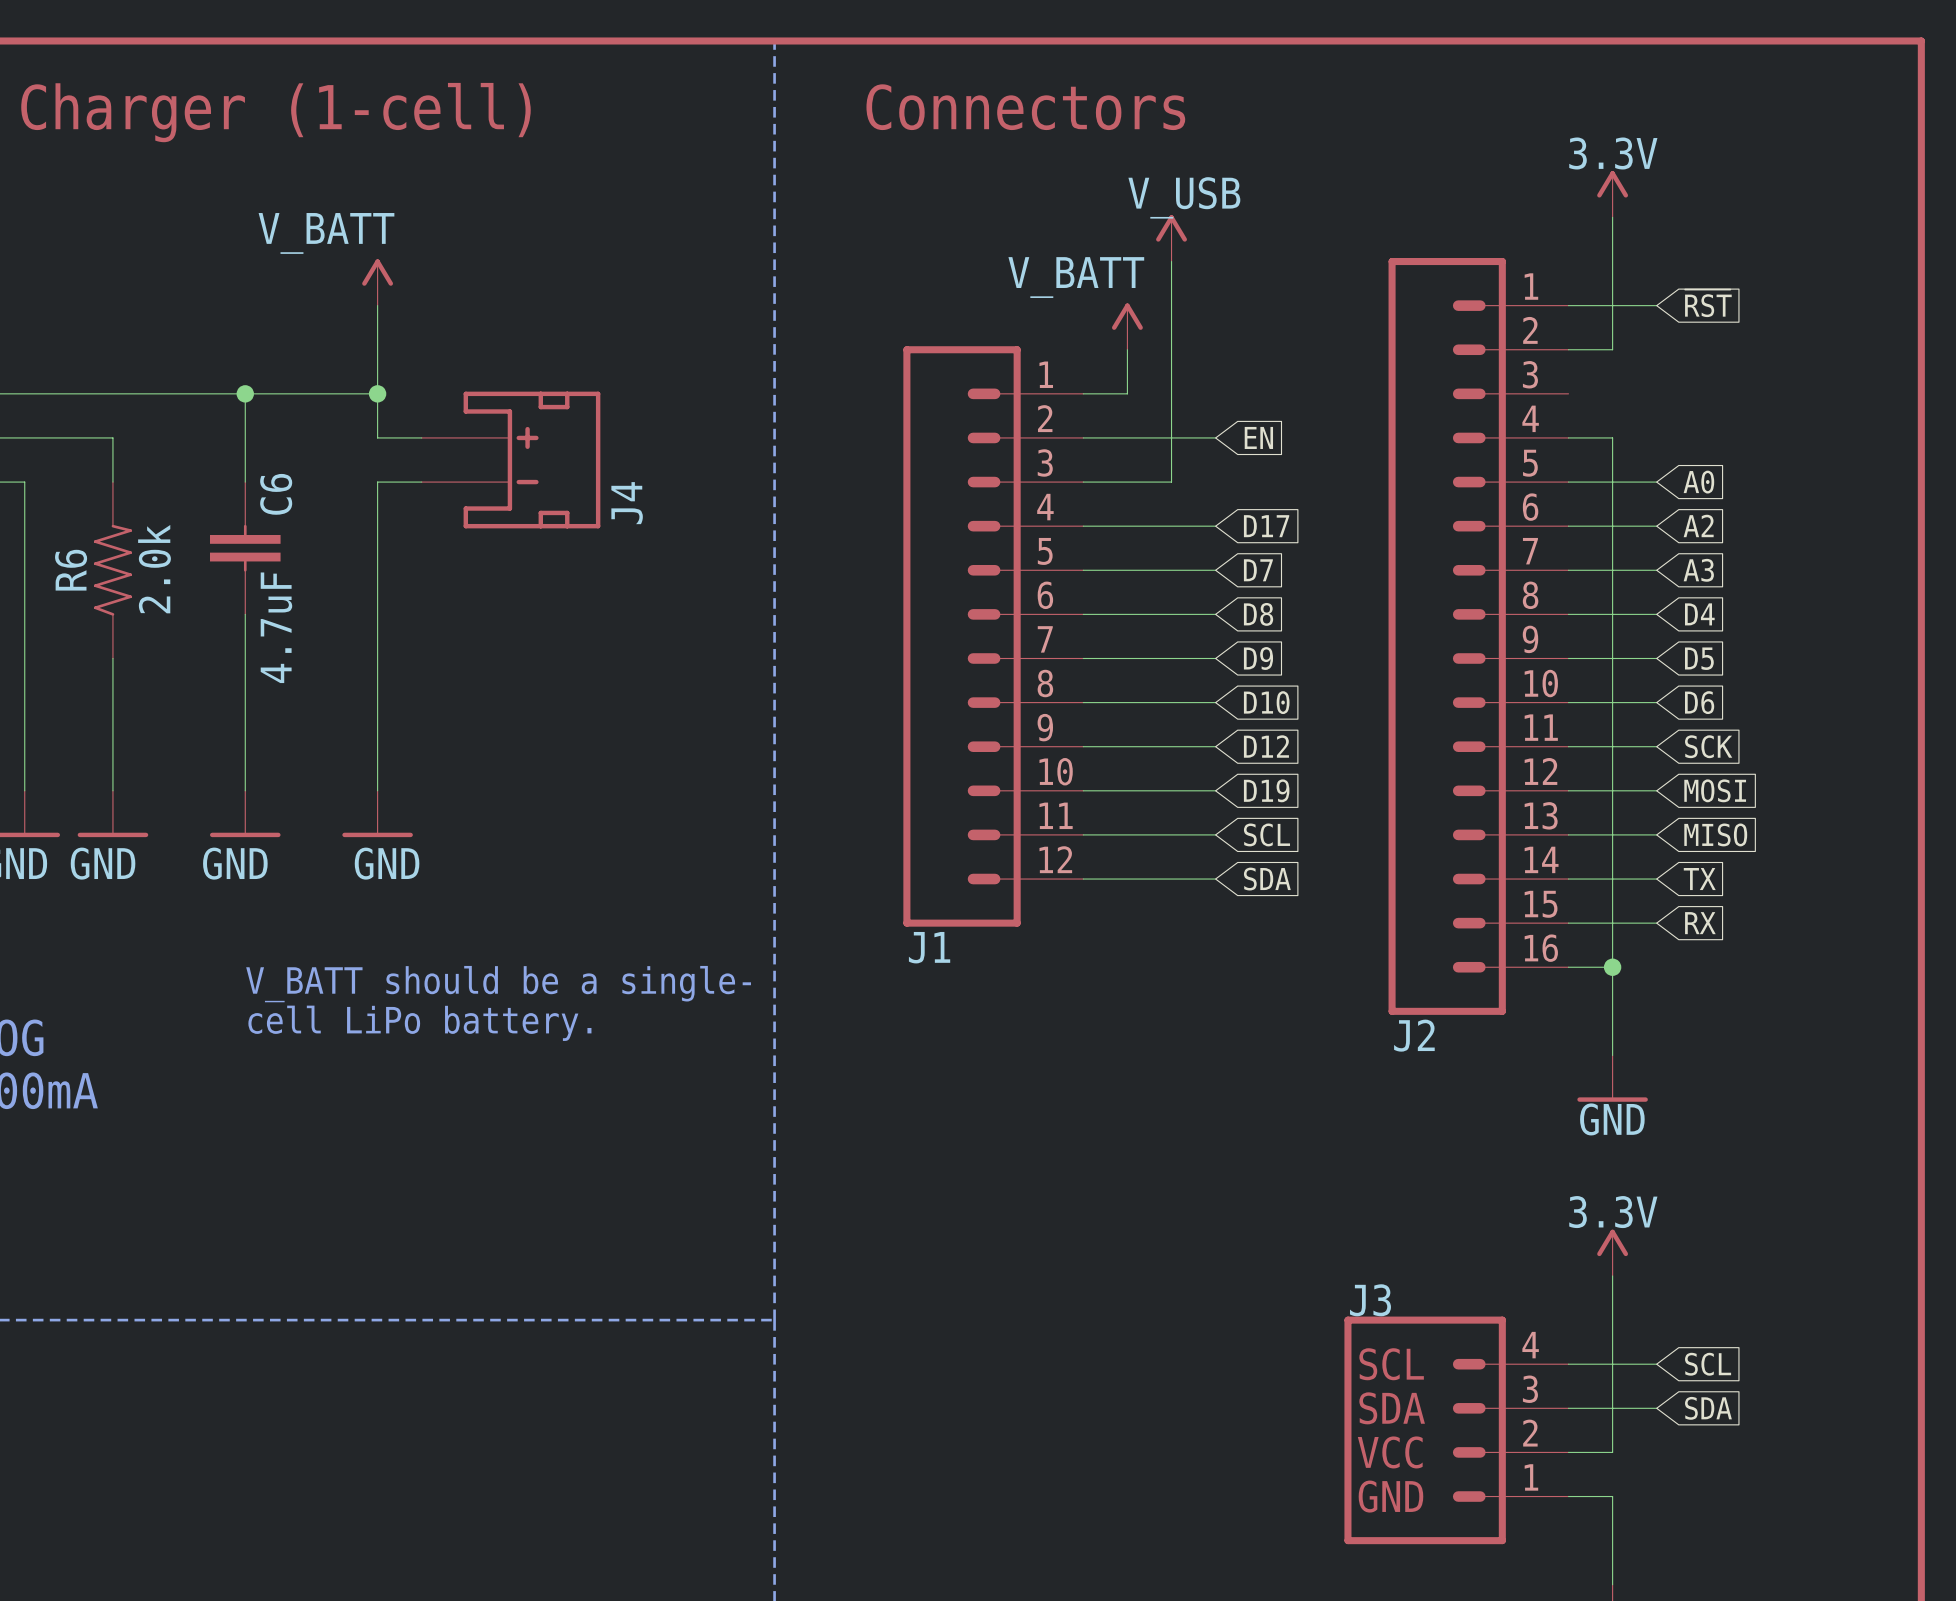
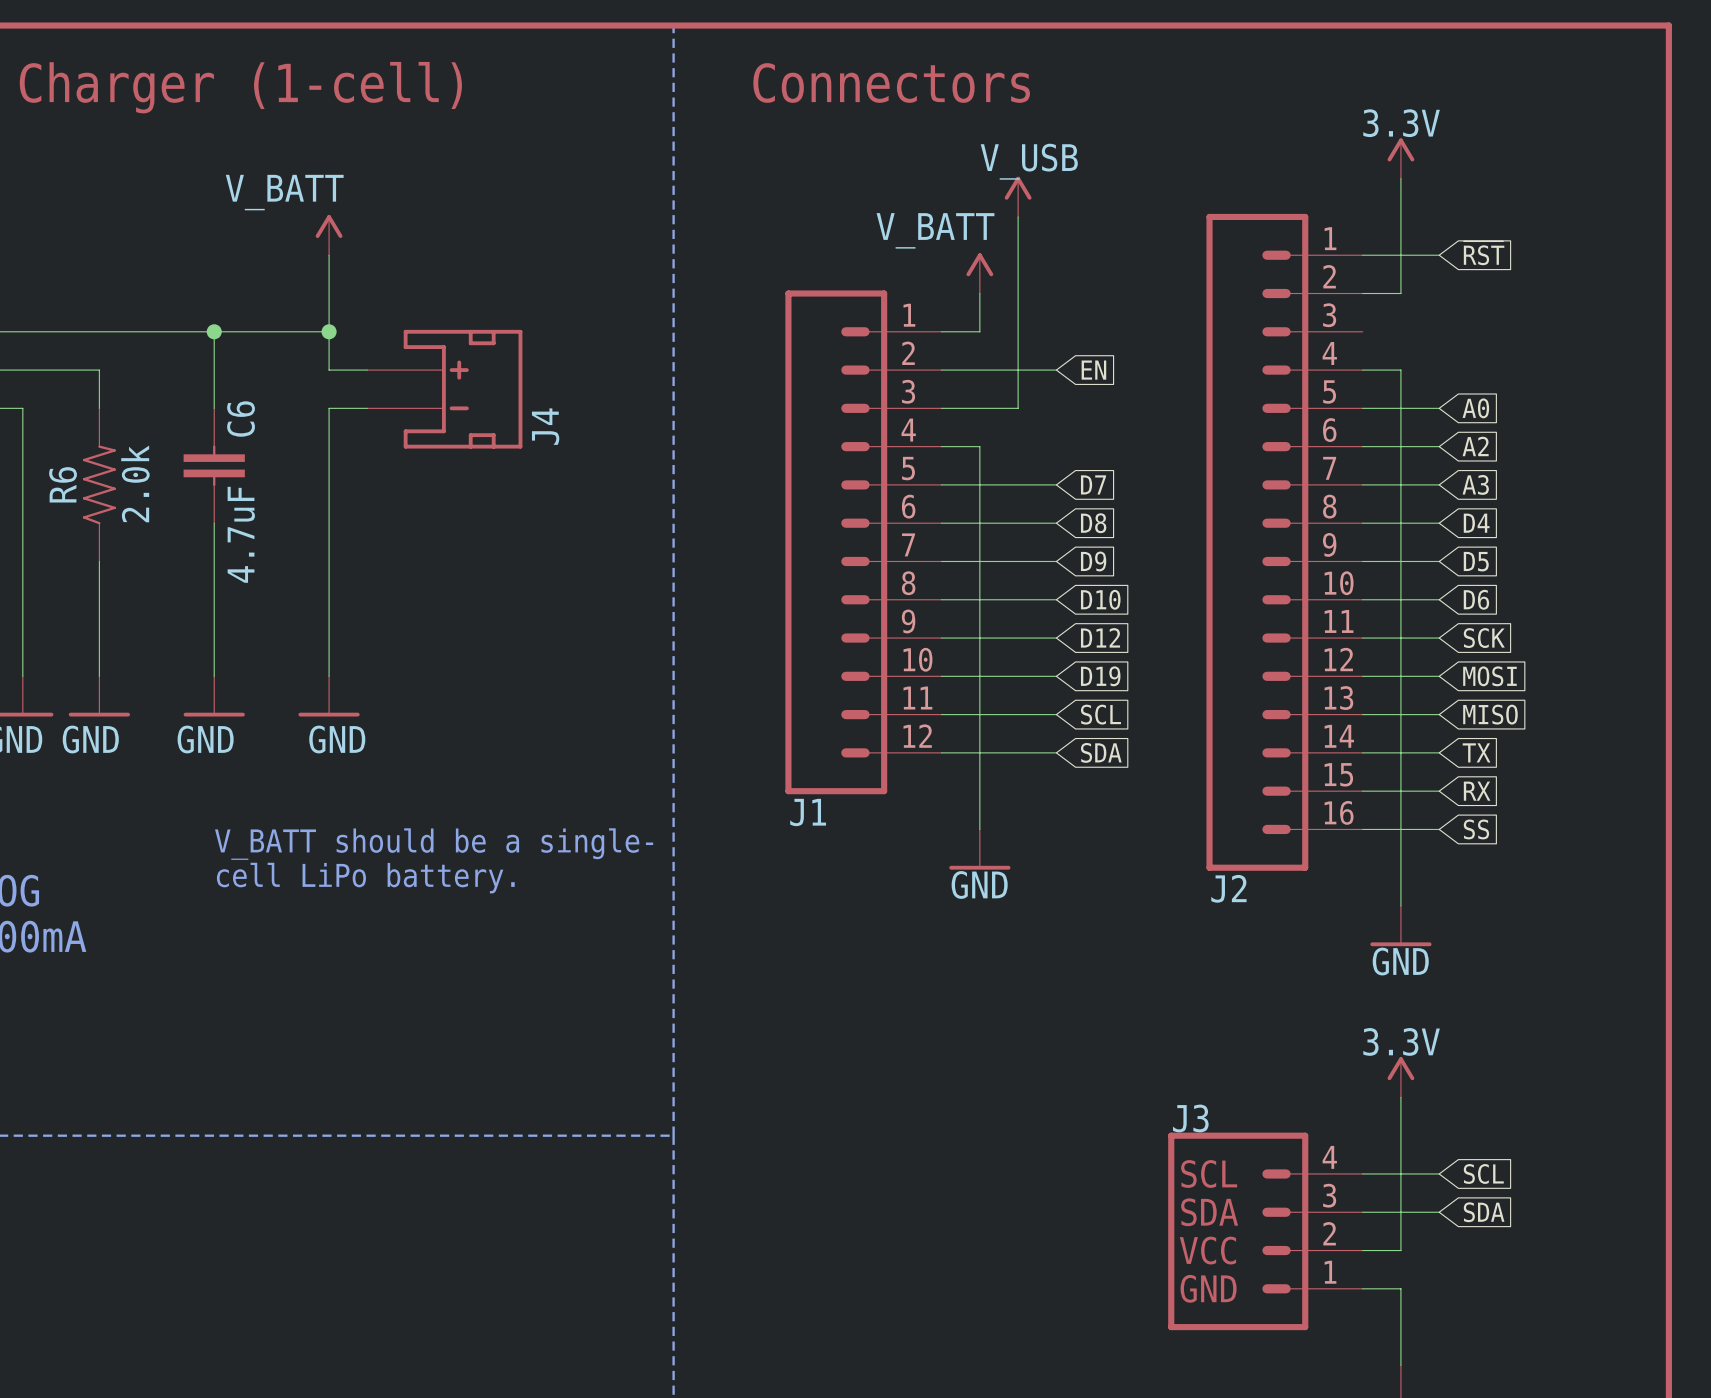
wire: (1127, 526) (1215, 526) -> (979, 446) (979, 829)
global label: D17 (1266, 526) -> none
wire: none -> (1400, 829) (1439, 829)
junction: (1612, 967) -> none
global label: none -> SS (1476, 829)
power symbol: none -> GND (979, 849)

